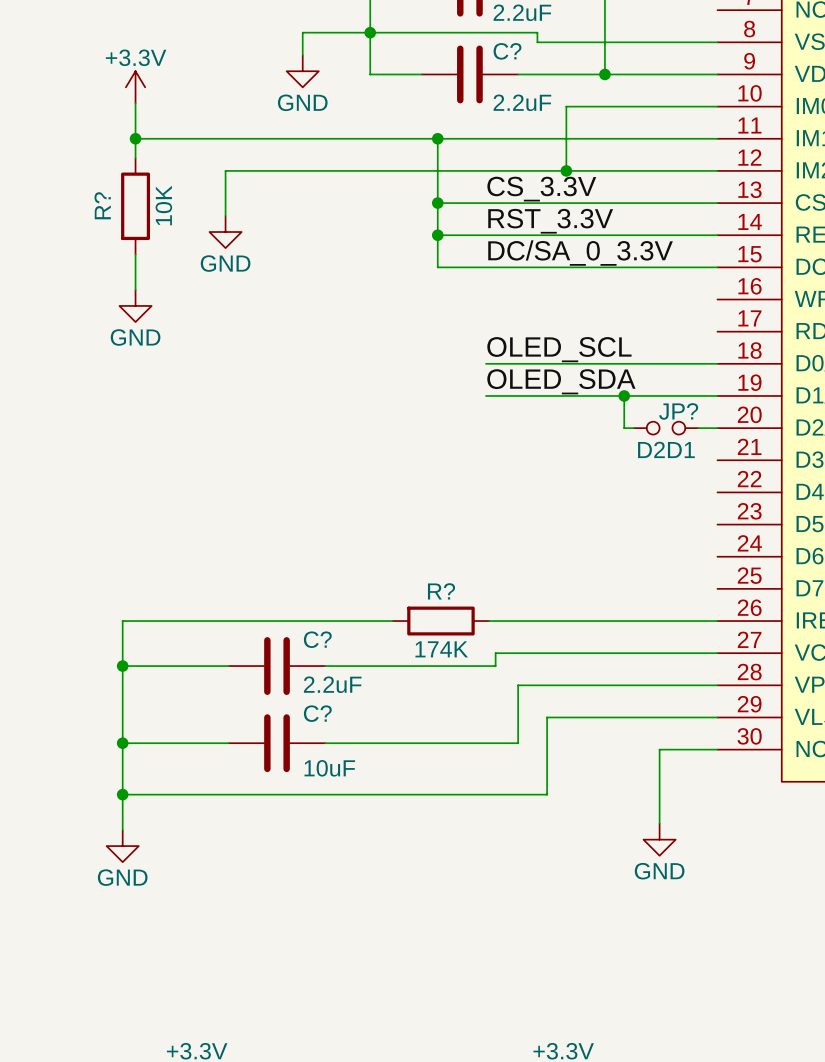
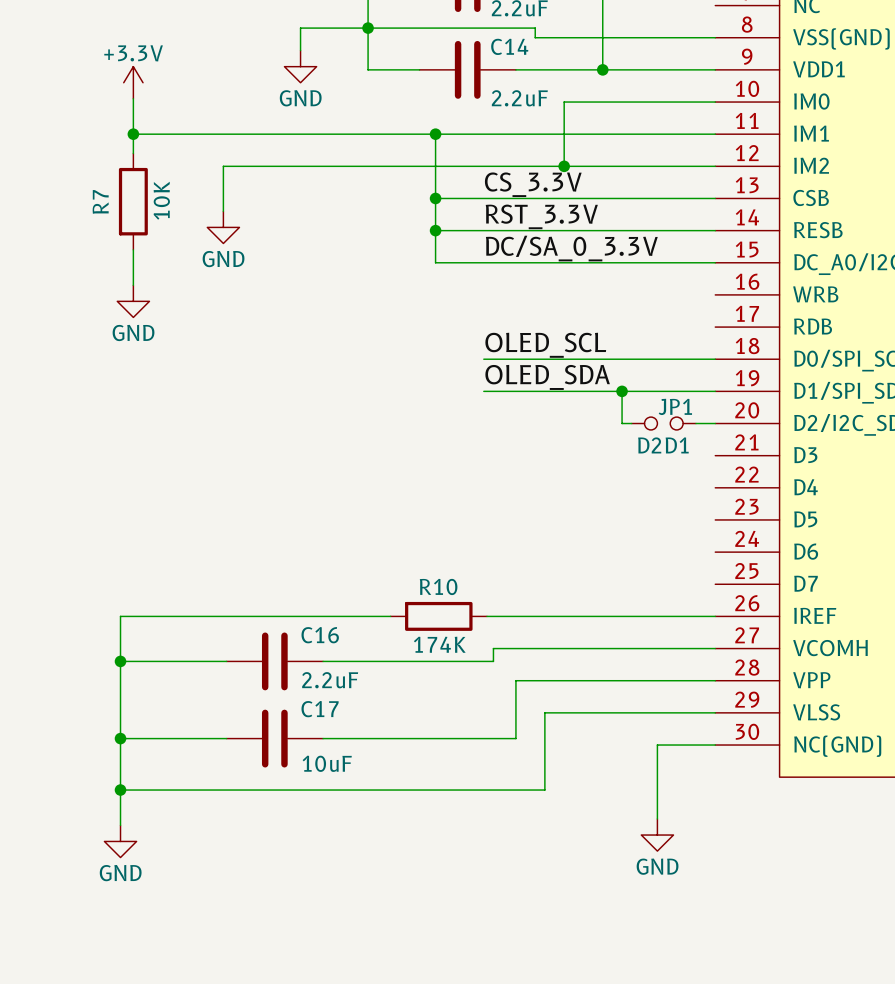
C? name: C? (507, 51) -> C14 (509, 46)
R? name: R? (102, 205) -> R7 (100, 201)
JP? name: JP? (678, 411) -> JP1 (675, 406)
R? name: R? (441, 591) -> R10 (438, 586)
C? name: C? (317, 639) -> C16 (320, 635)
C? name: C? (317, 713) -> C17 (320, 709)

